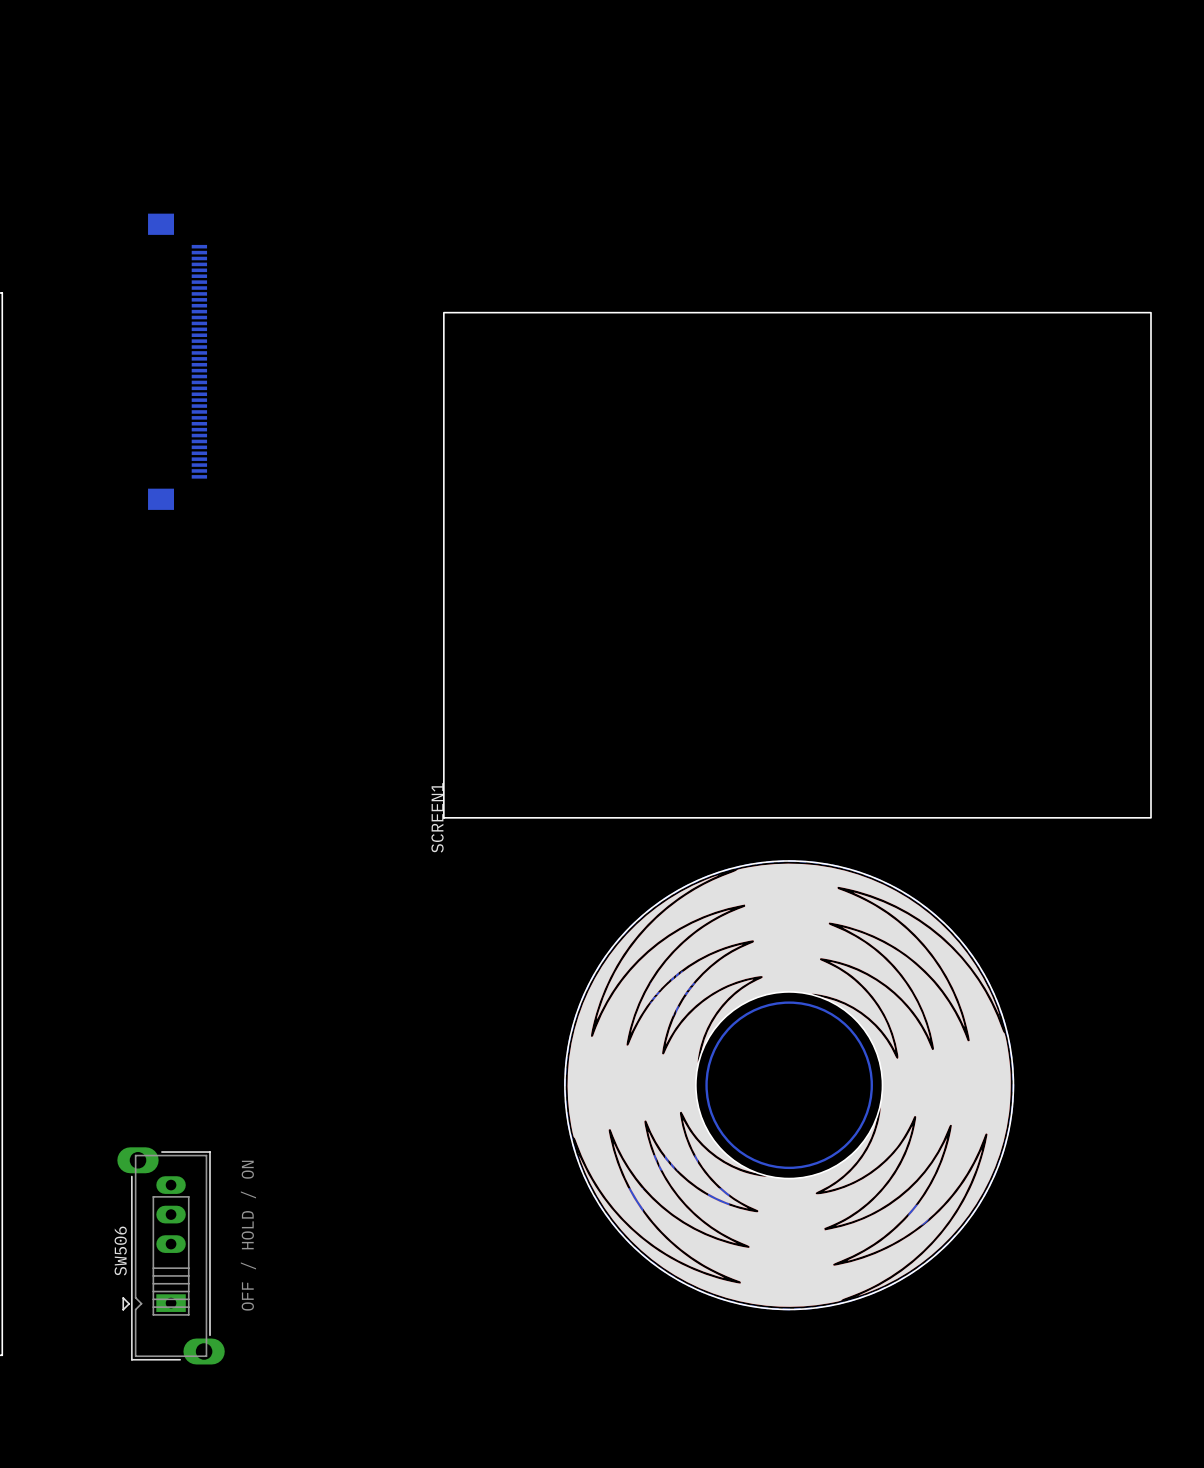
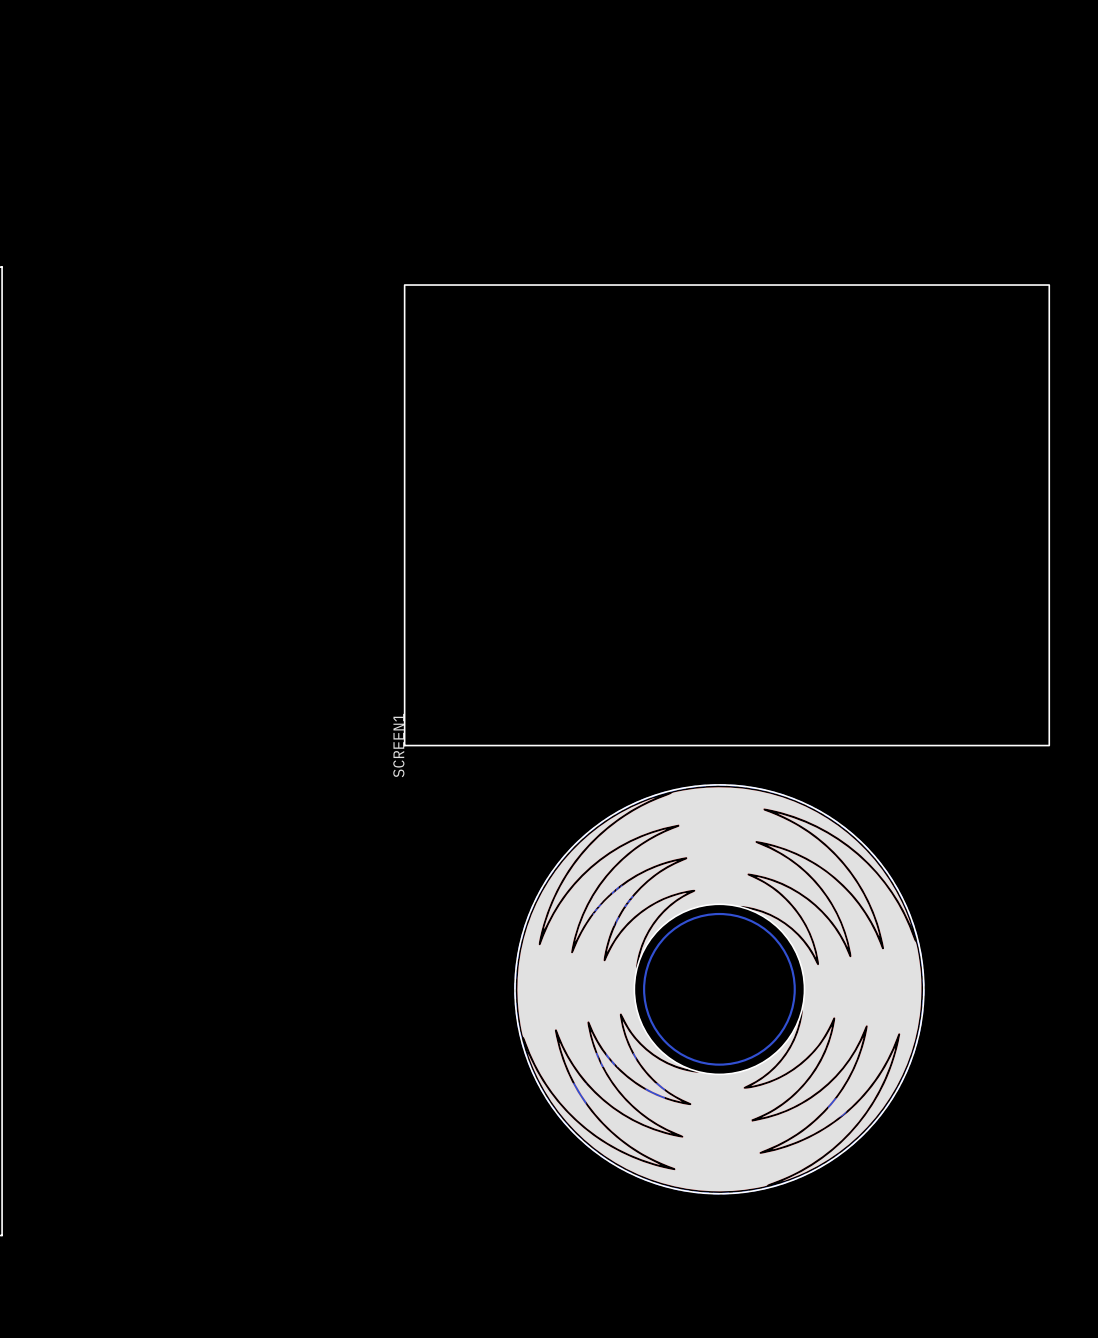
part: (177, 361) -> none
SW506: OFF / HOLD / ON (171, 1255) -> none

